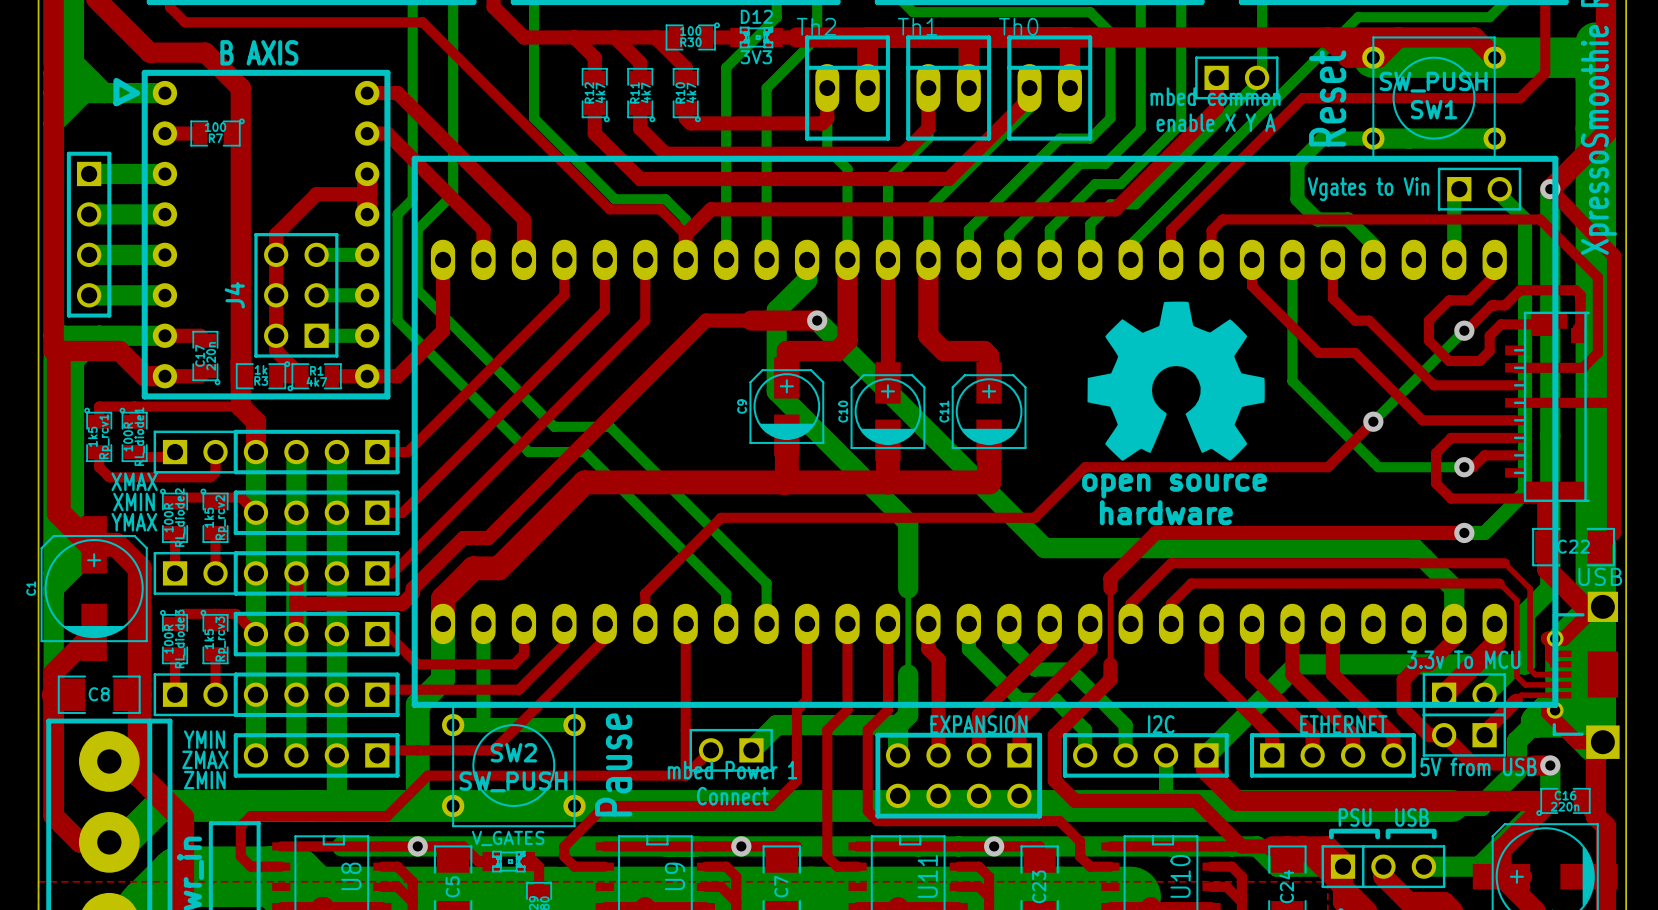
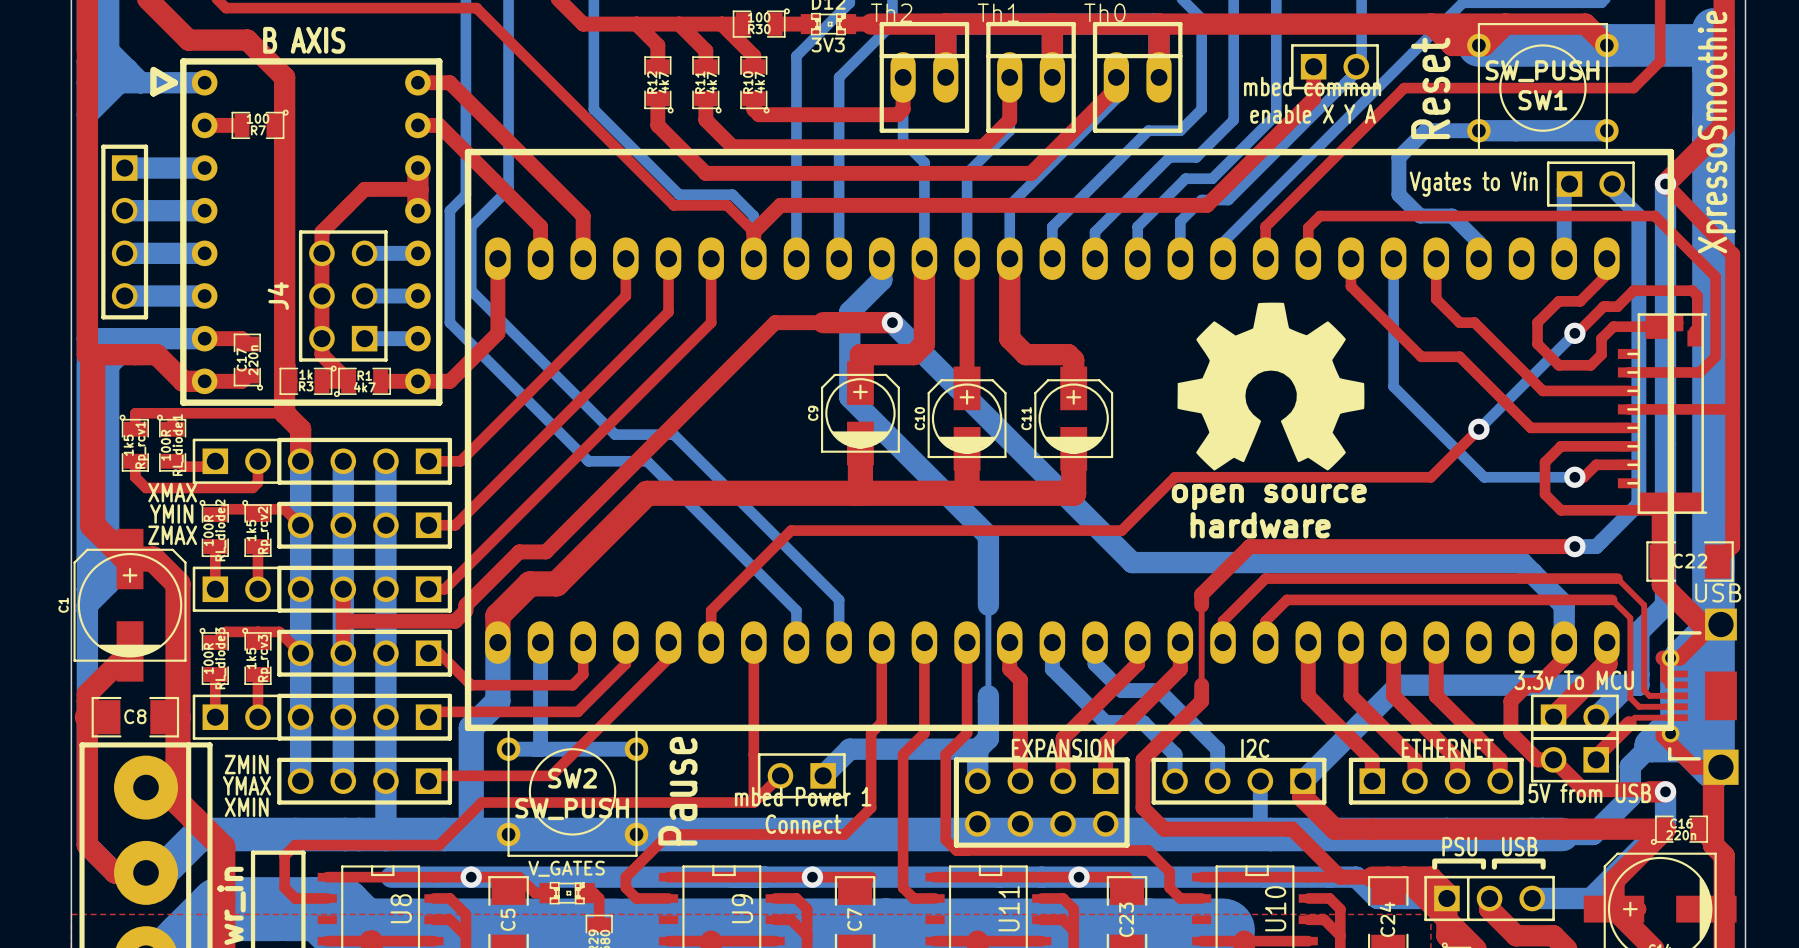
text: XMIN (134, 502) -> YMIN (171, 513)
text: YMAX (134, 522) -> ZMAX (172, 535)
text: YMIN (204, 739) -> ZMIN (246, 764)
text: ZMAX (205, 759) -> YMAX (247, 785)
text: ZMIN (204, 780) -> XMIN (246, 807)

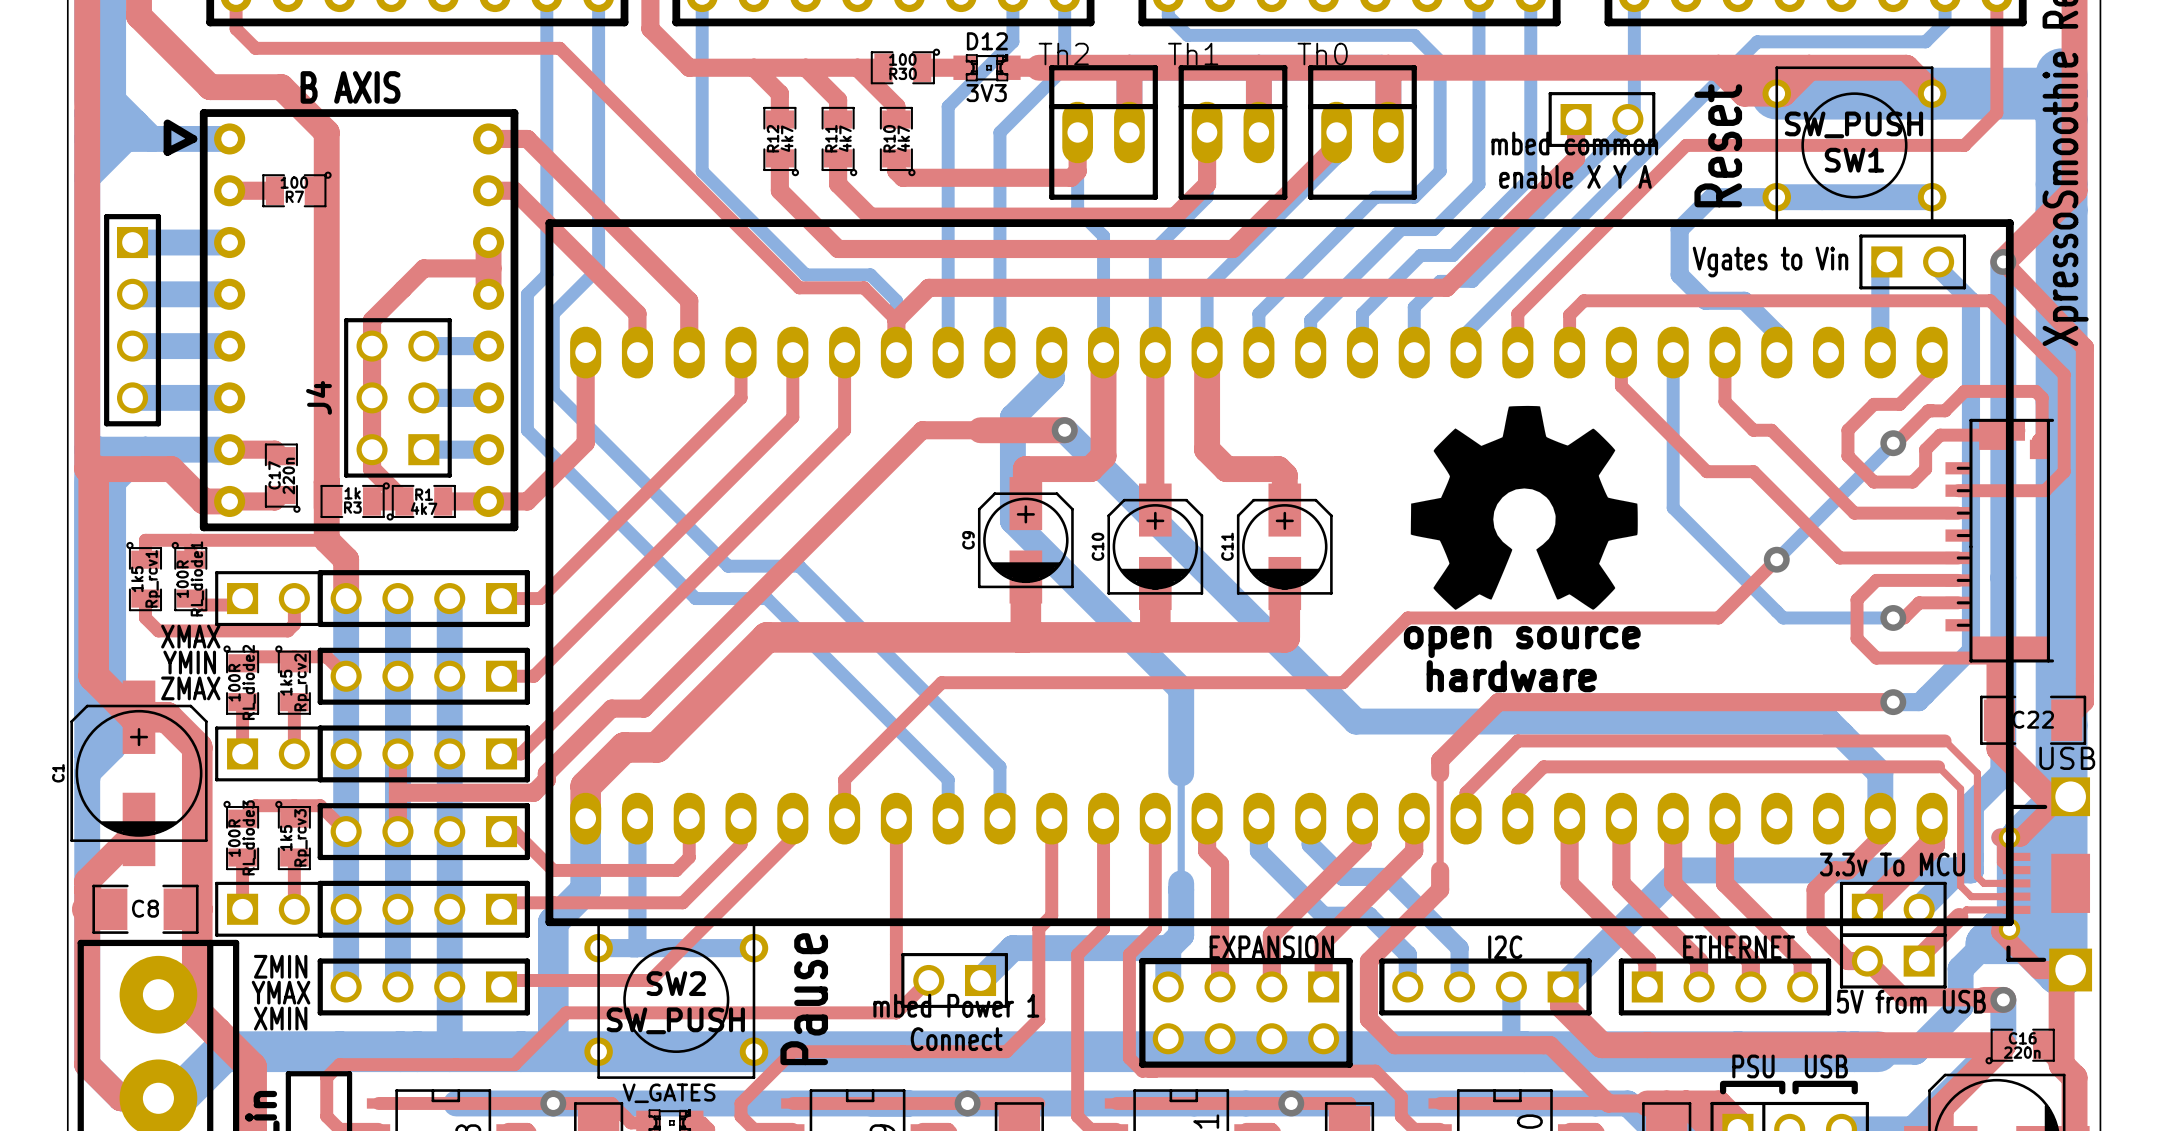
top track: (1628, 409) (1732, 409) -> none

